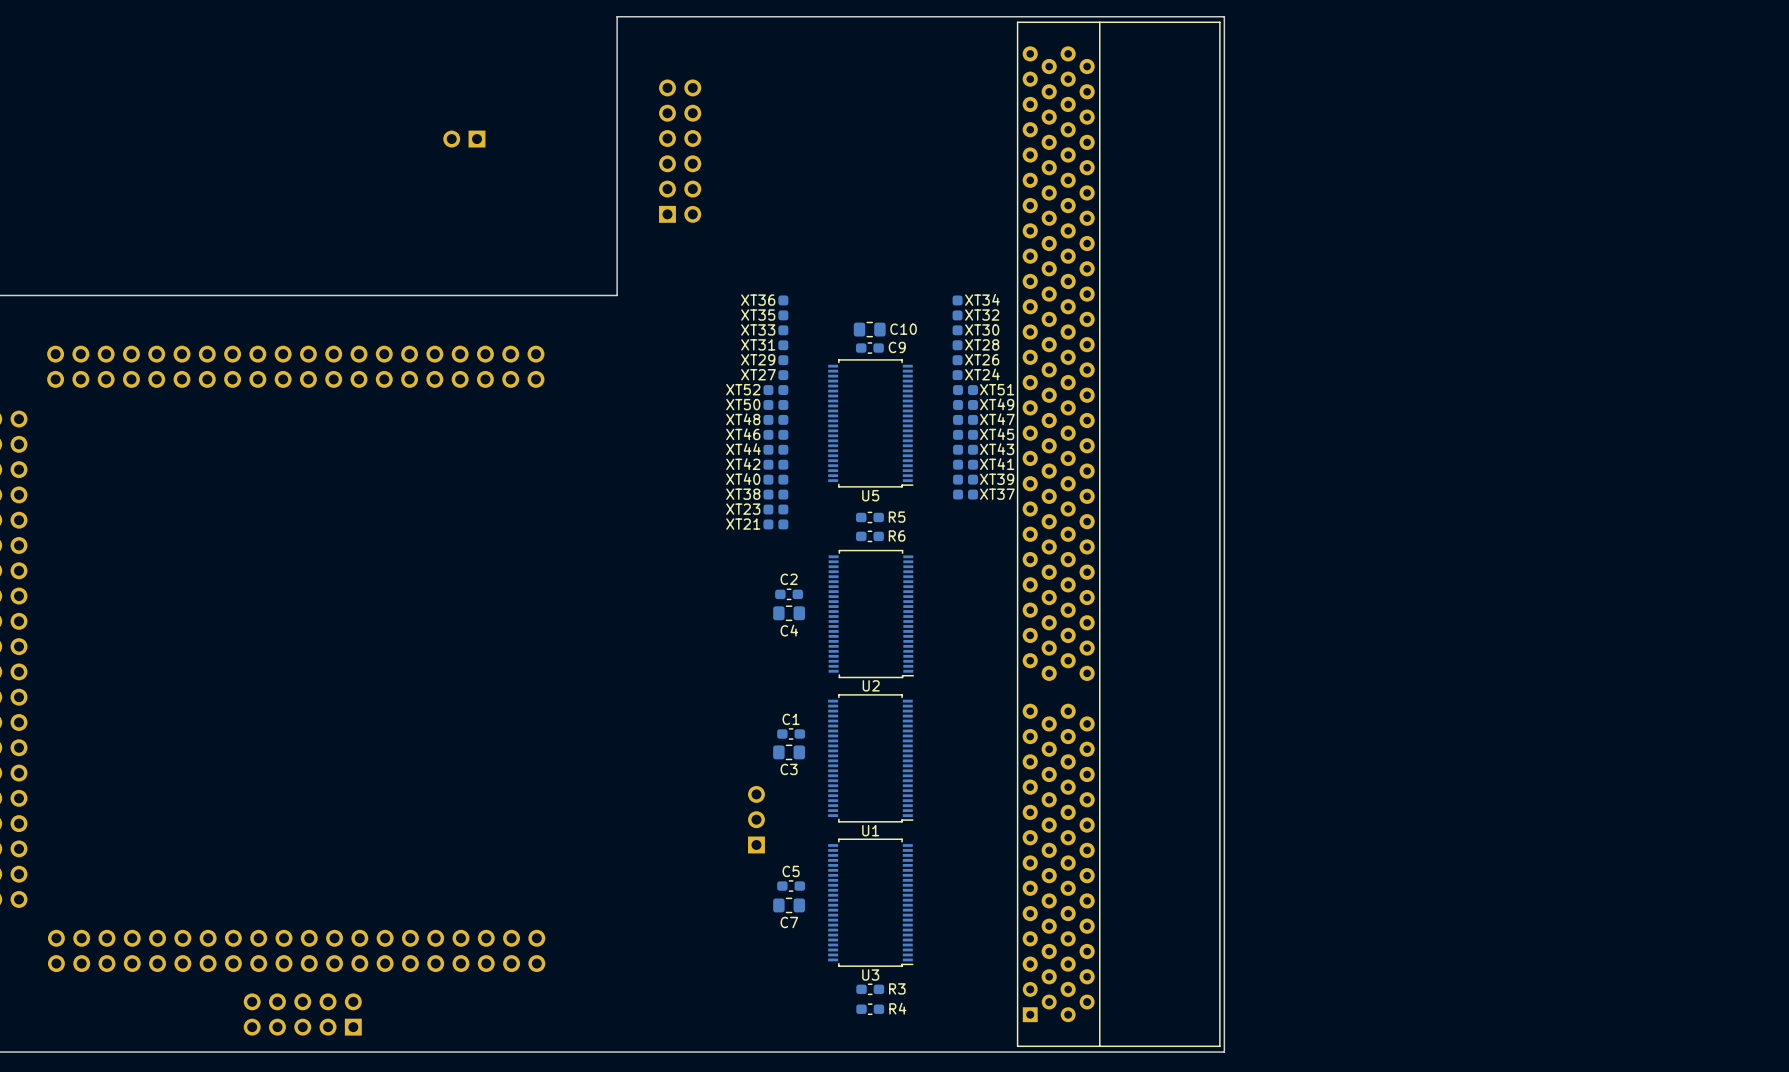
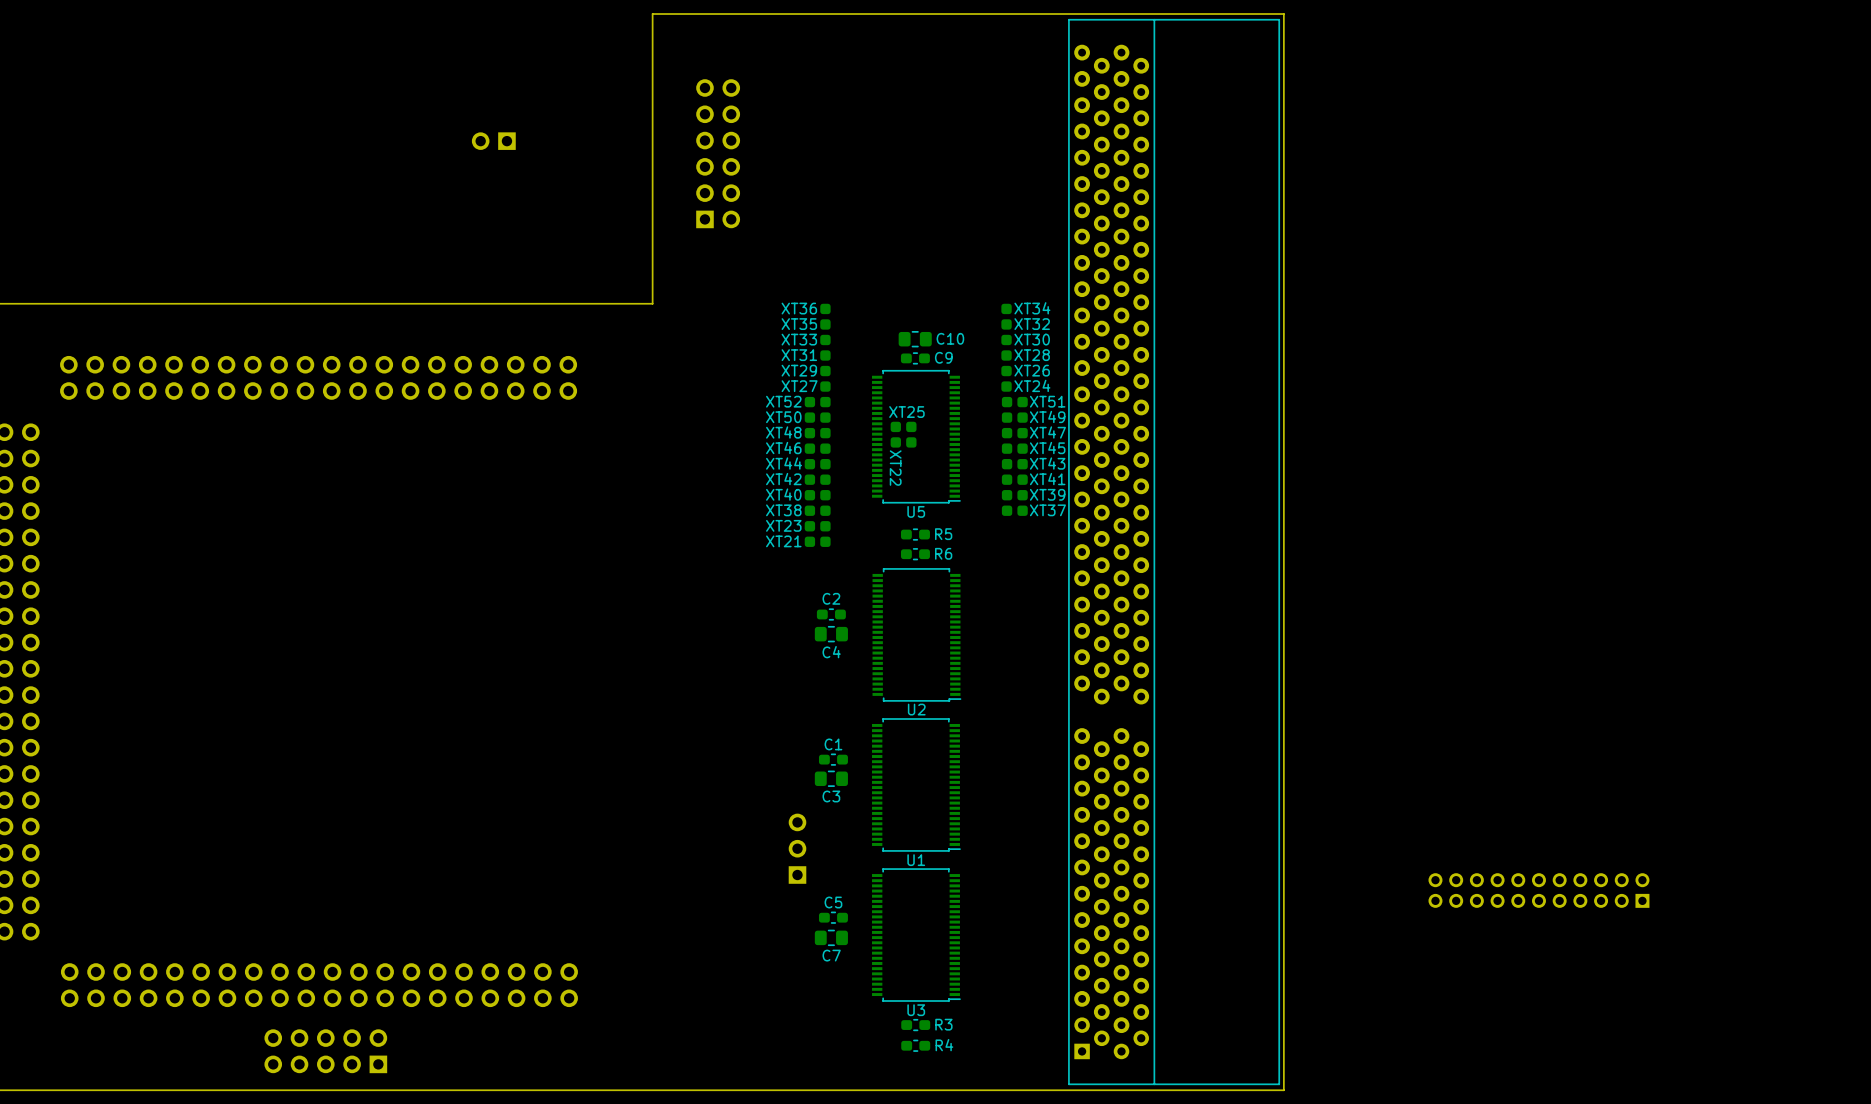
XT25: none -> (903, 426)
XT22: none -> (903, 442)
part: none -> (1538, 890)

